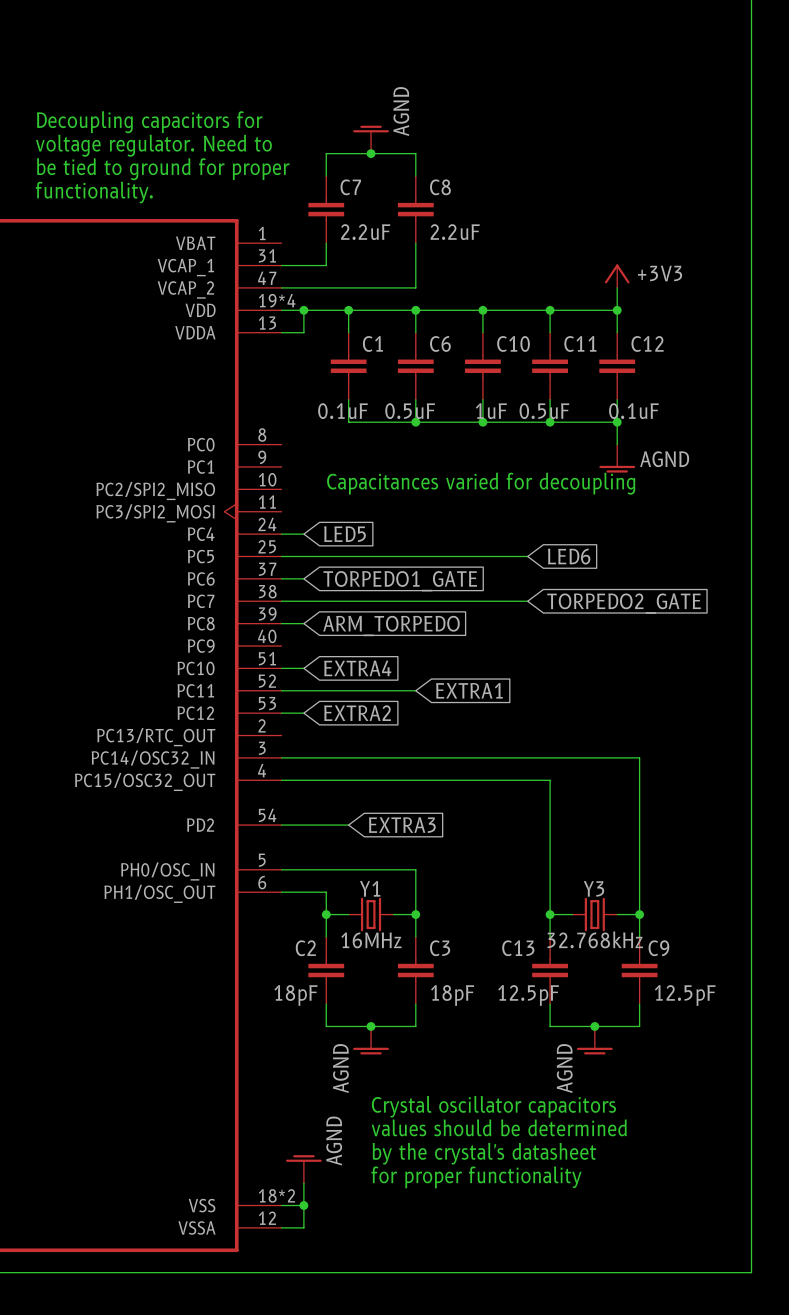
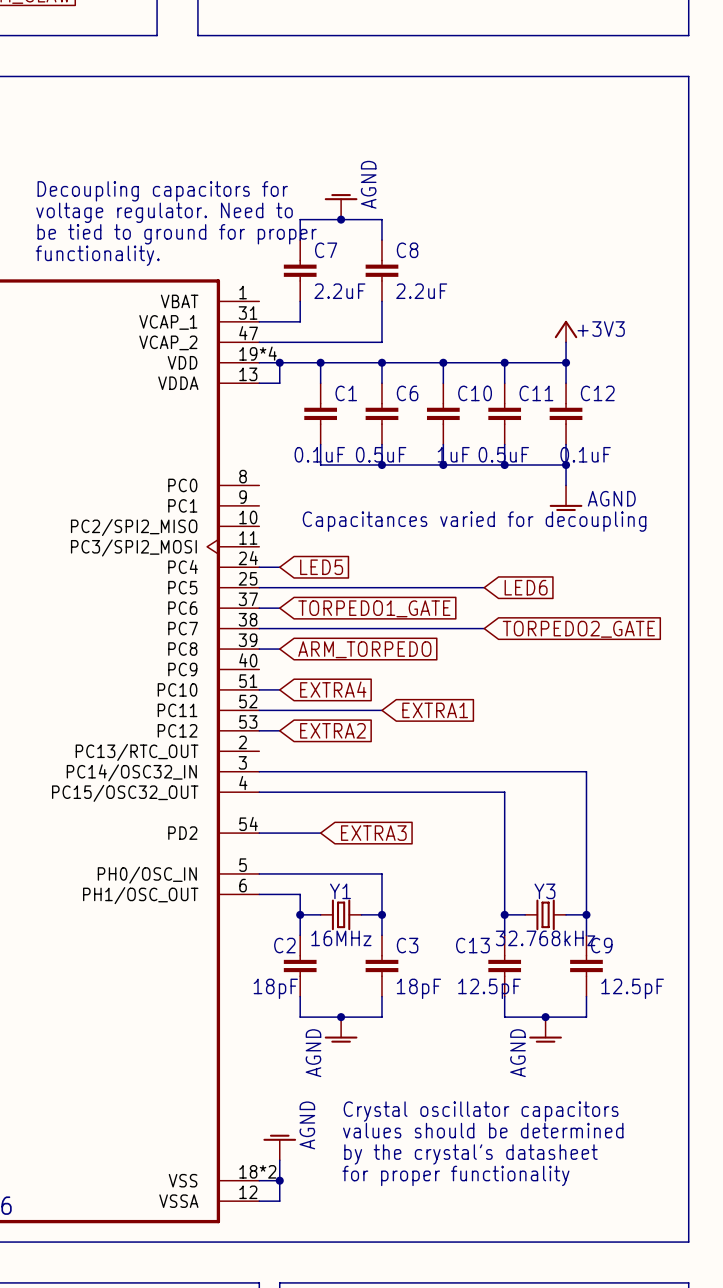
text: Crystal oscillator capacitors (493, 1106) -> none
text: values should be determined (499, 1127) -> Crystal oscillator capacitors (481, 1111)
text: by the crystal's datasheet (484, 1153) -> values should be determined (483, 1130)
text: for proper functionality (476, 1177) -> by the crystal's datasheet (470, 1154)
text: none -> for proper functionality (455, 1175)

